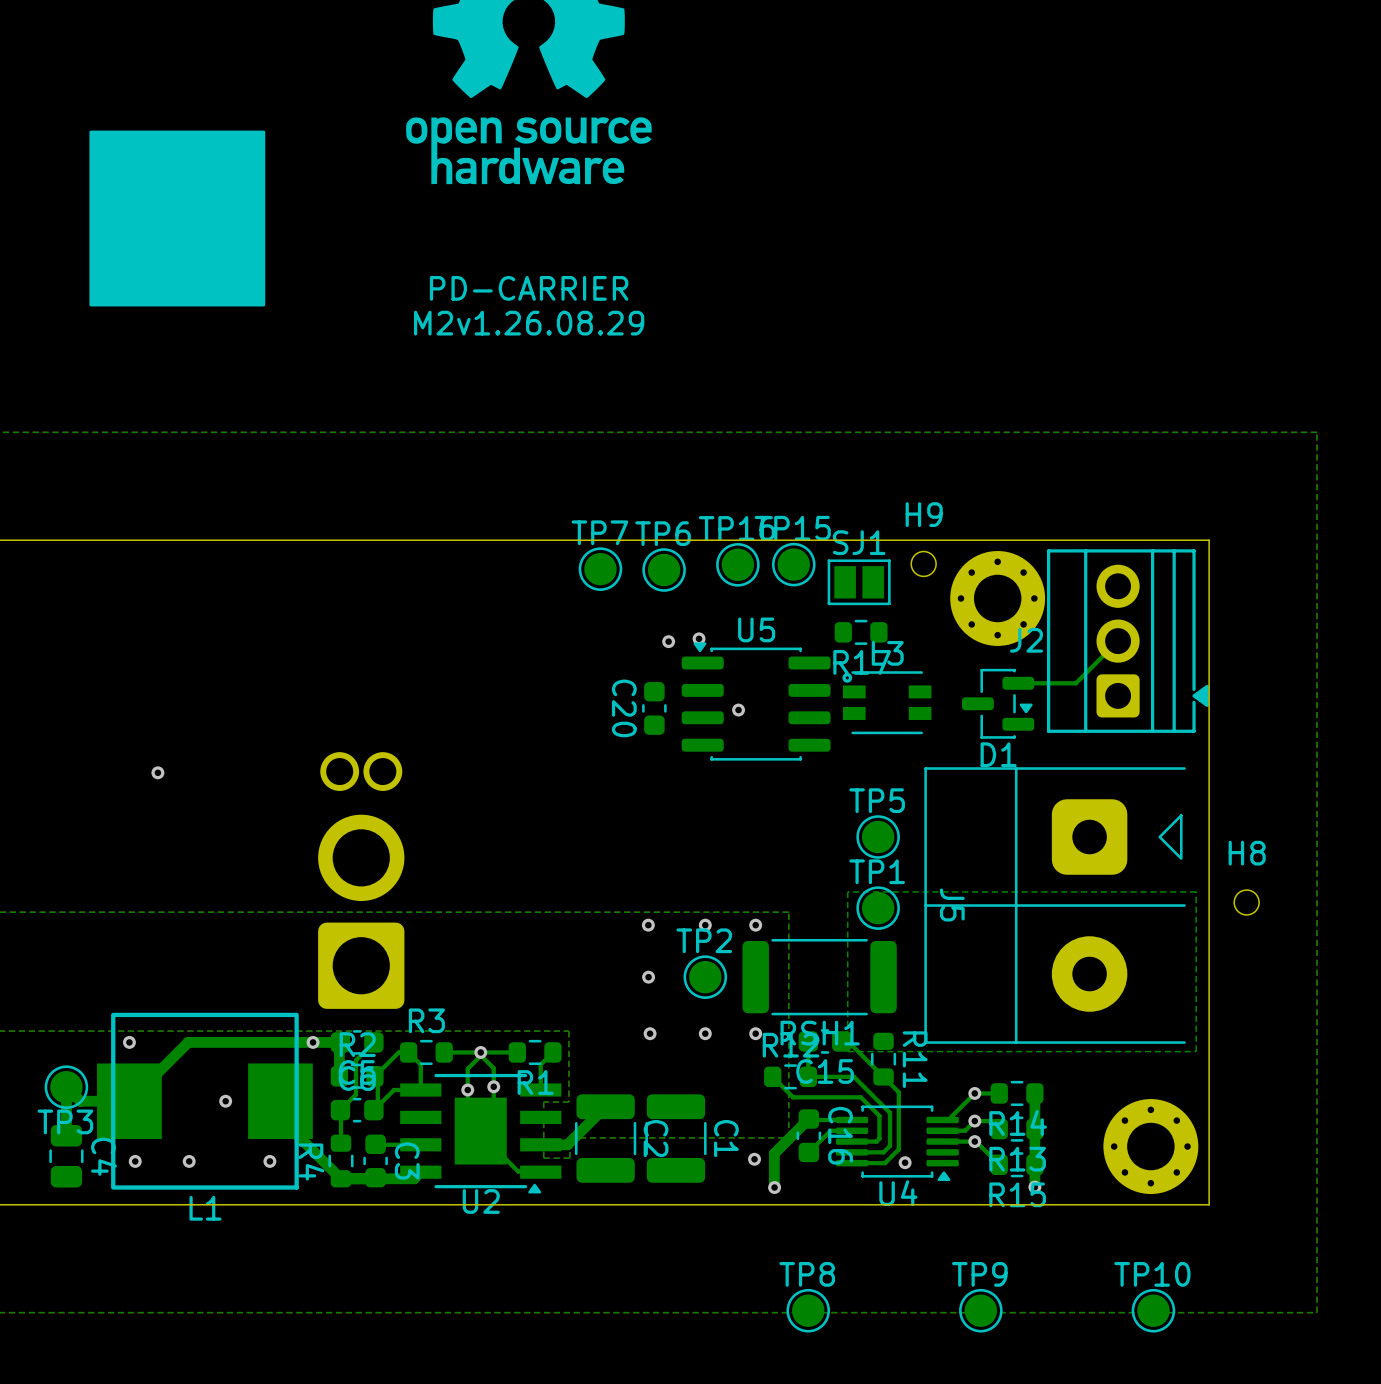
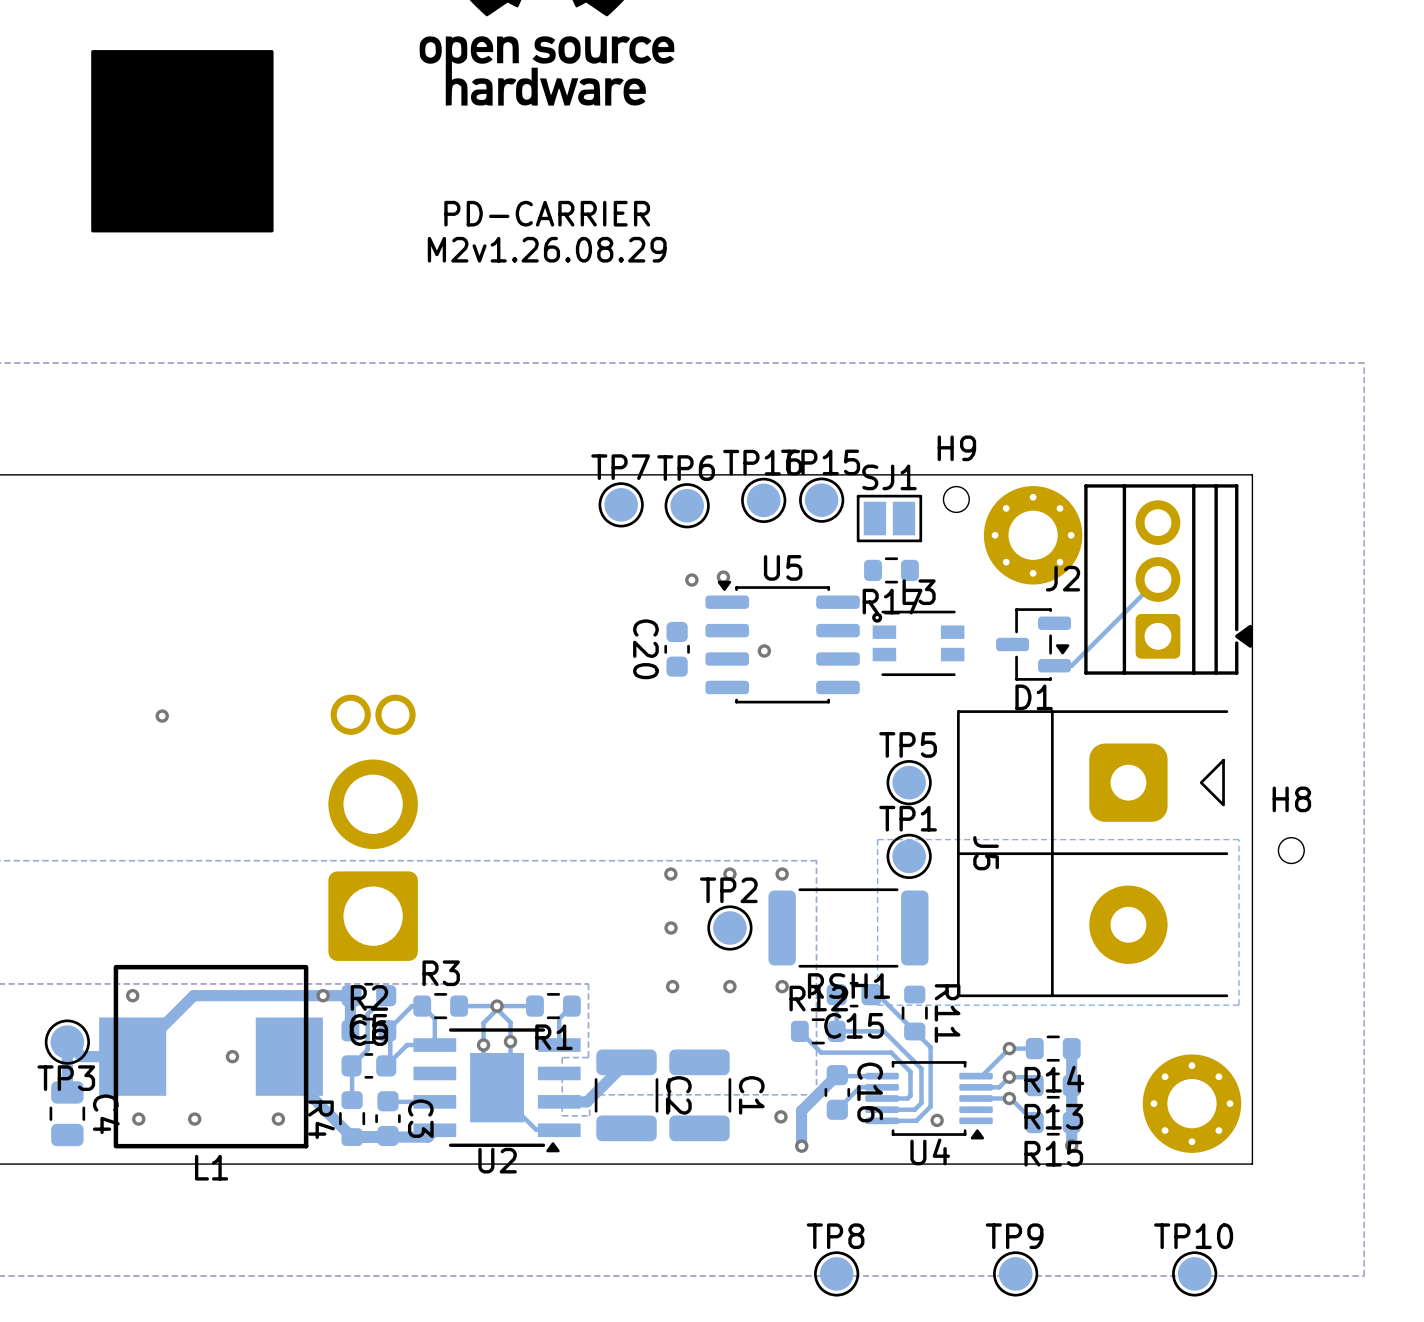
bottom track: (1075, 683) (1018, 683) -> (1114, 623) (1071, 665) (1054, 665)

